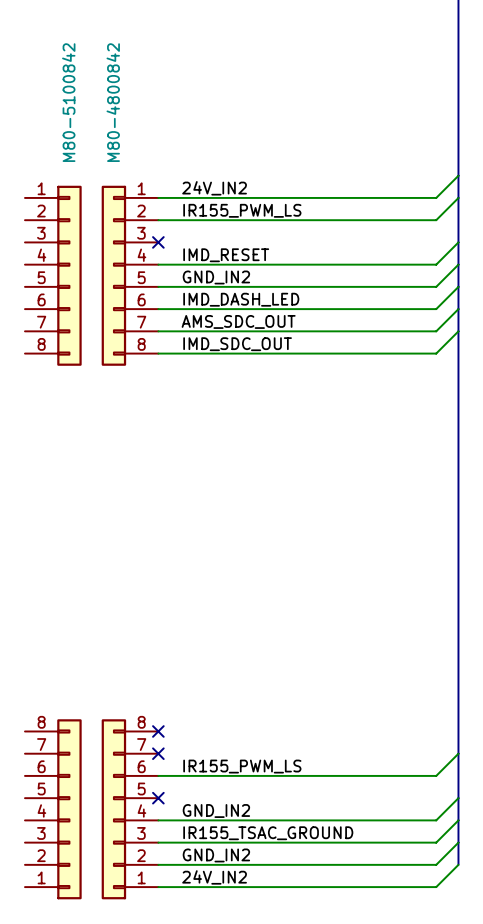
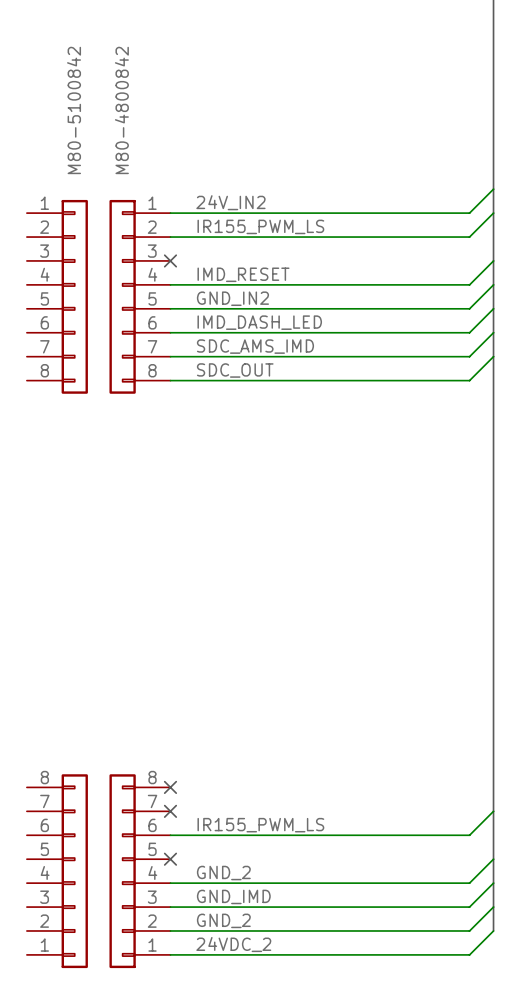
label: AMS_SDC_OUT (238, 321) -> SDC_AMS_IMD (255, 346)
label: IMD_SDC_OUT (237, 344) -> SDC_OUT (235, 370)
label: GND_IN2 (216, 811) -> GND_2 (223, 873)
label: IR155_TSAC_GROUND (268, 833) -> GND_IMD (233, 896)
label: GND_IN2 (216, 855) -> GND_2 (223, 920)
label: 24V_IN2 (214, 877) -> 24VDC_2 (233, 944)

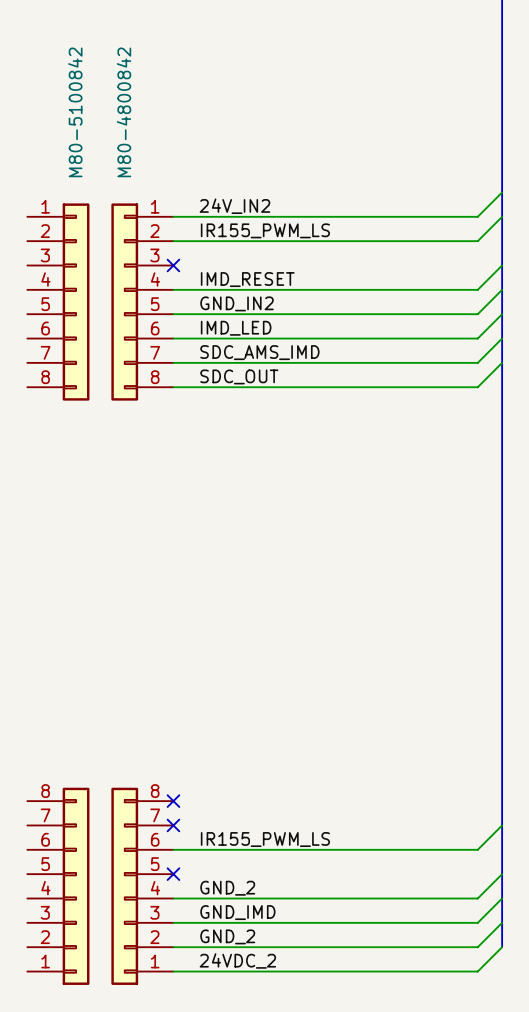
label: IMD_DASH_LED (259, 322) -> IMD_LED (236, 328)

